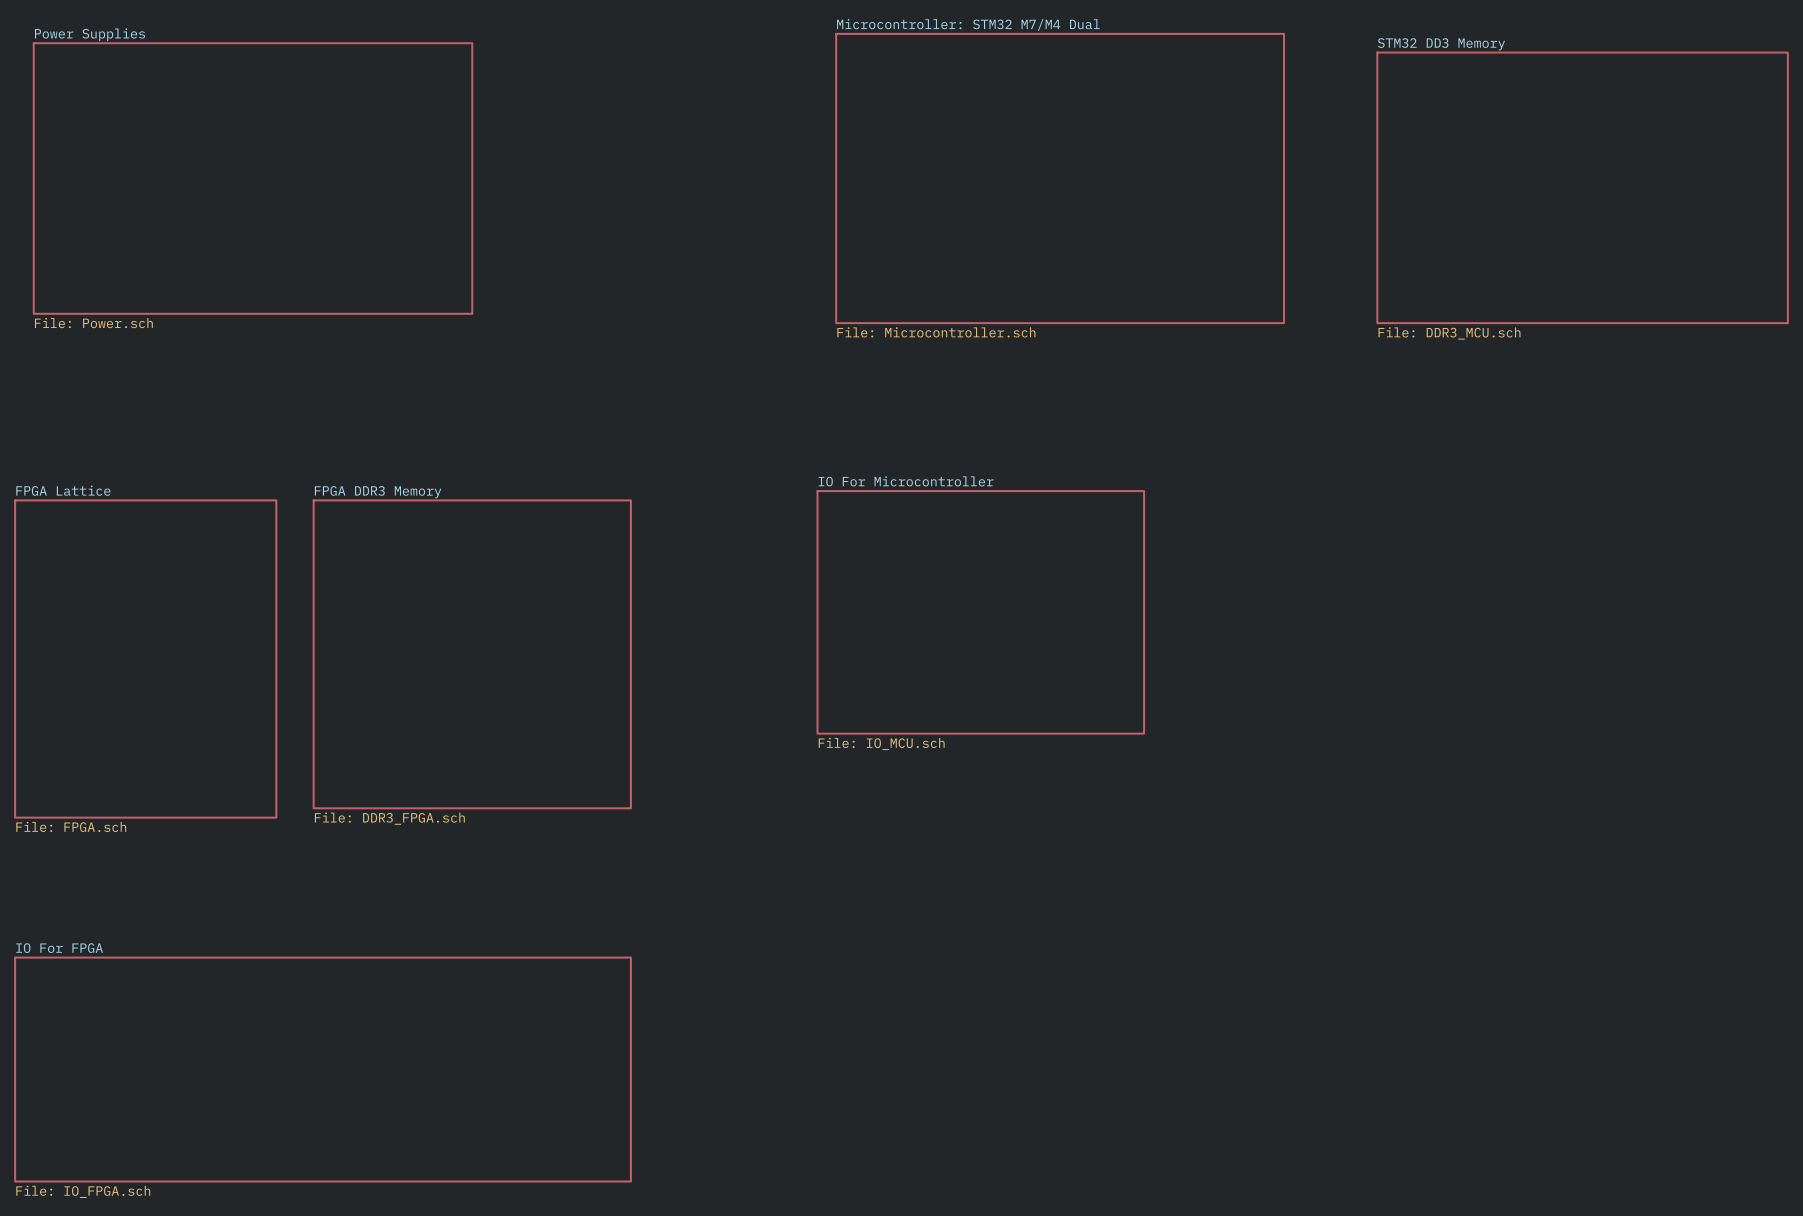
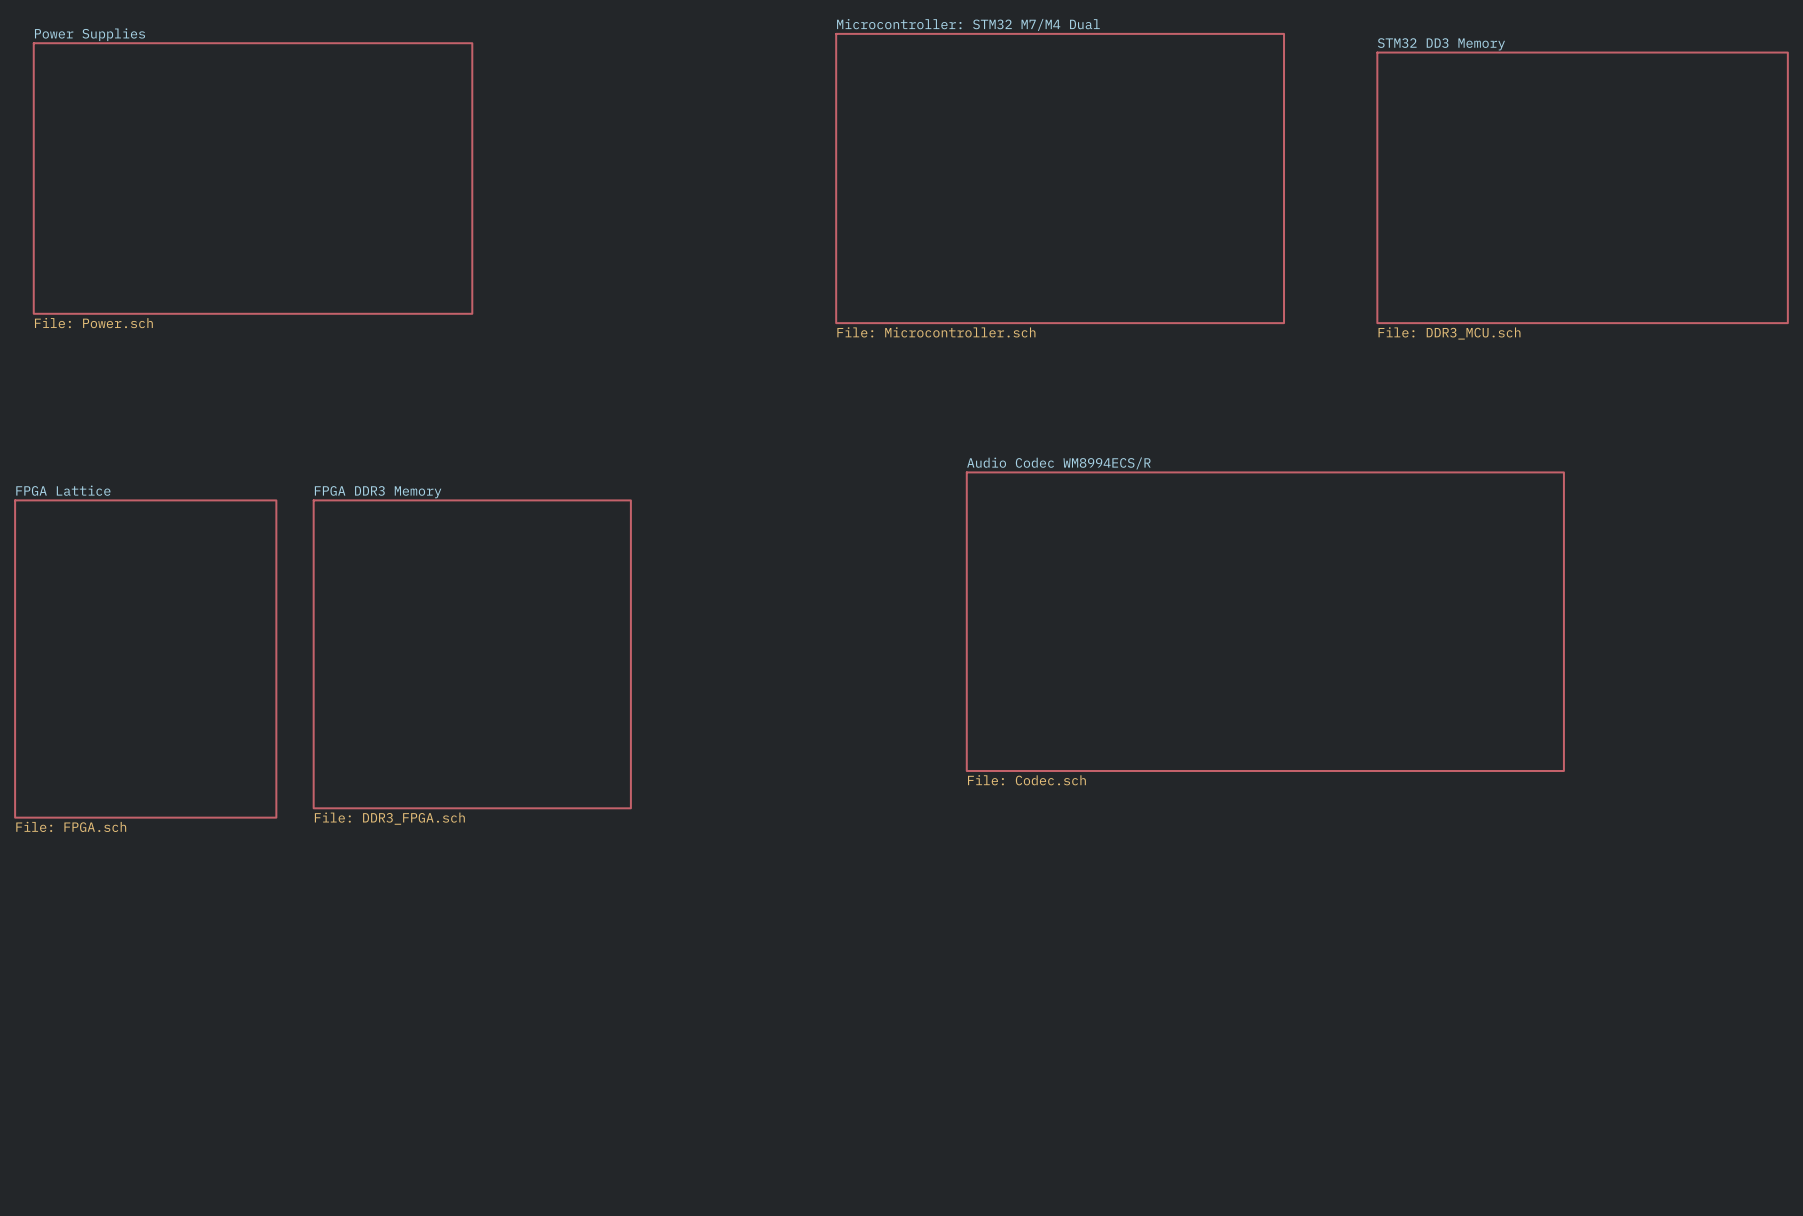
sheet IO For Microcontroller: File: IO_MCU.sch (980, 612) -> none
sheet Audio Codec WM8994ECS/R: none -> File: Codec.sch (1265, 621)
sheet IO For FPGA: File: IO_FPGA.sch (323, 1069) -> none

